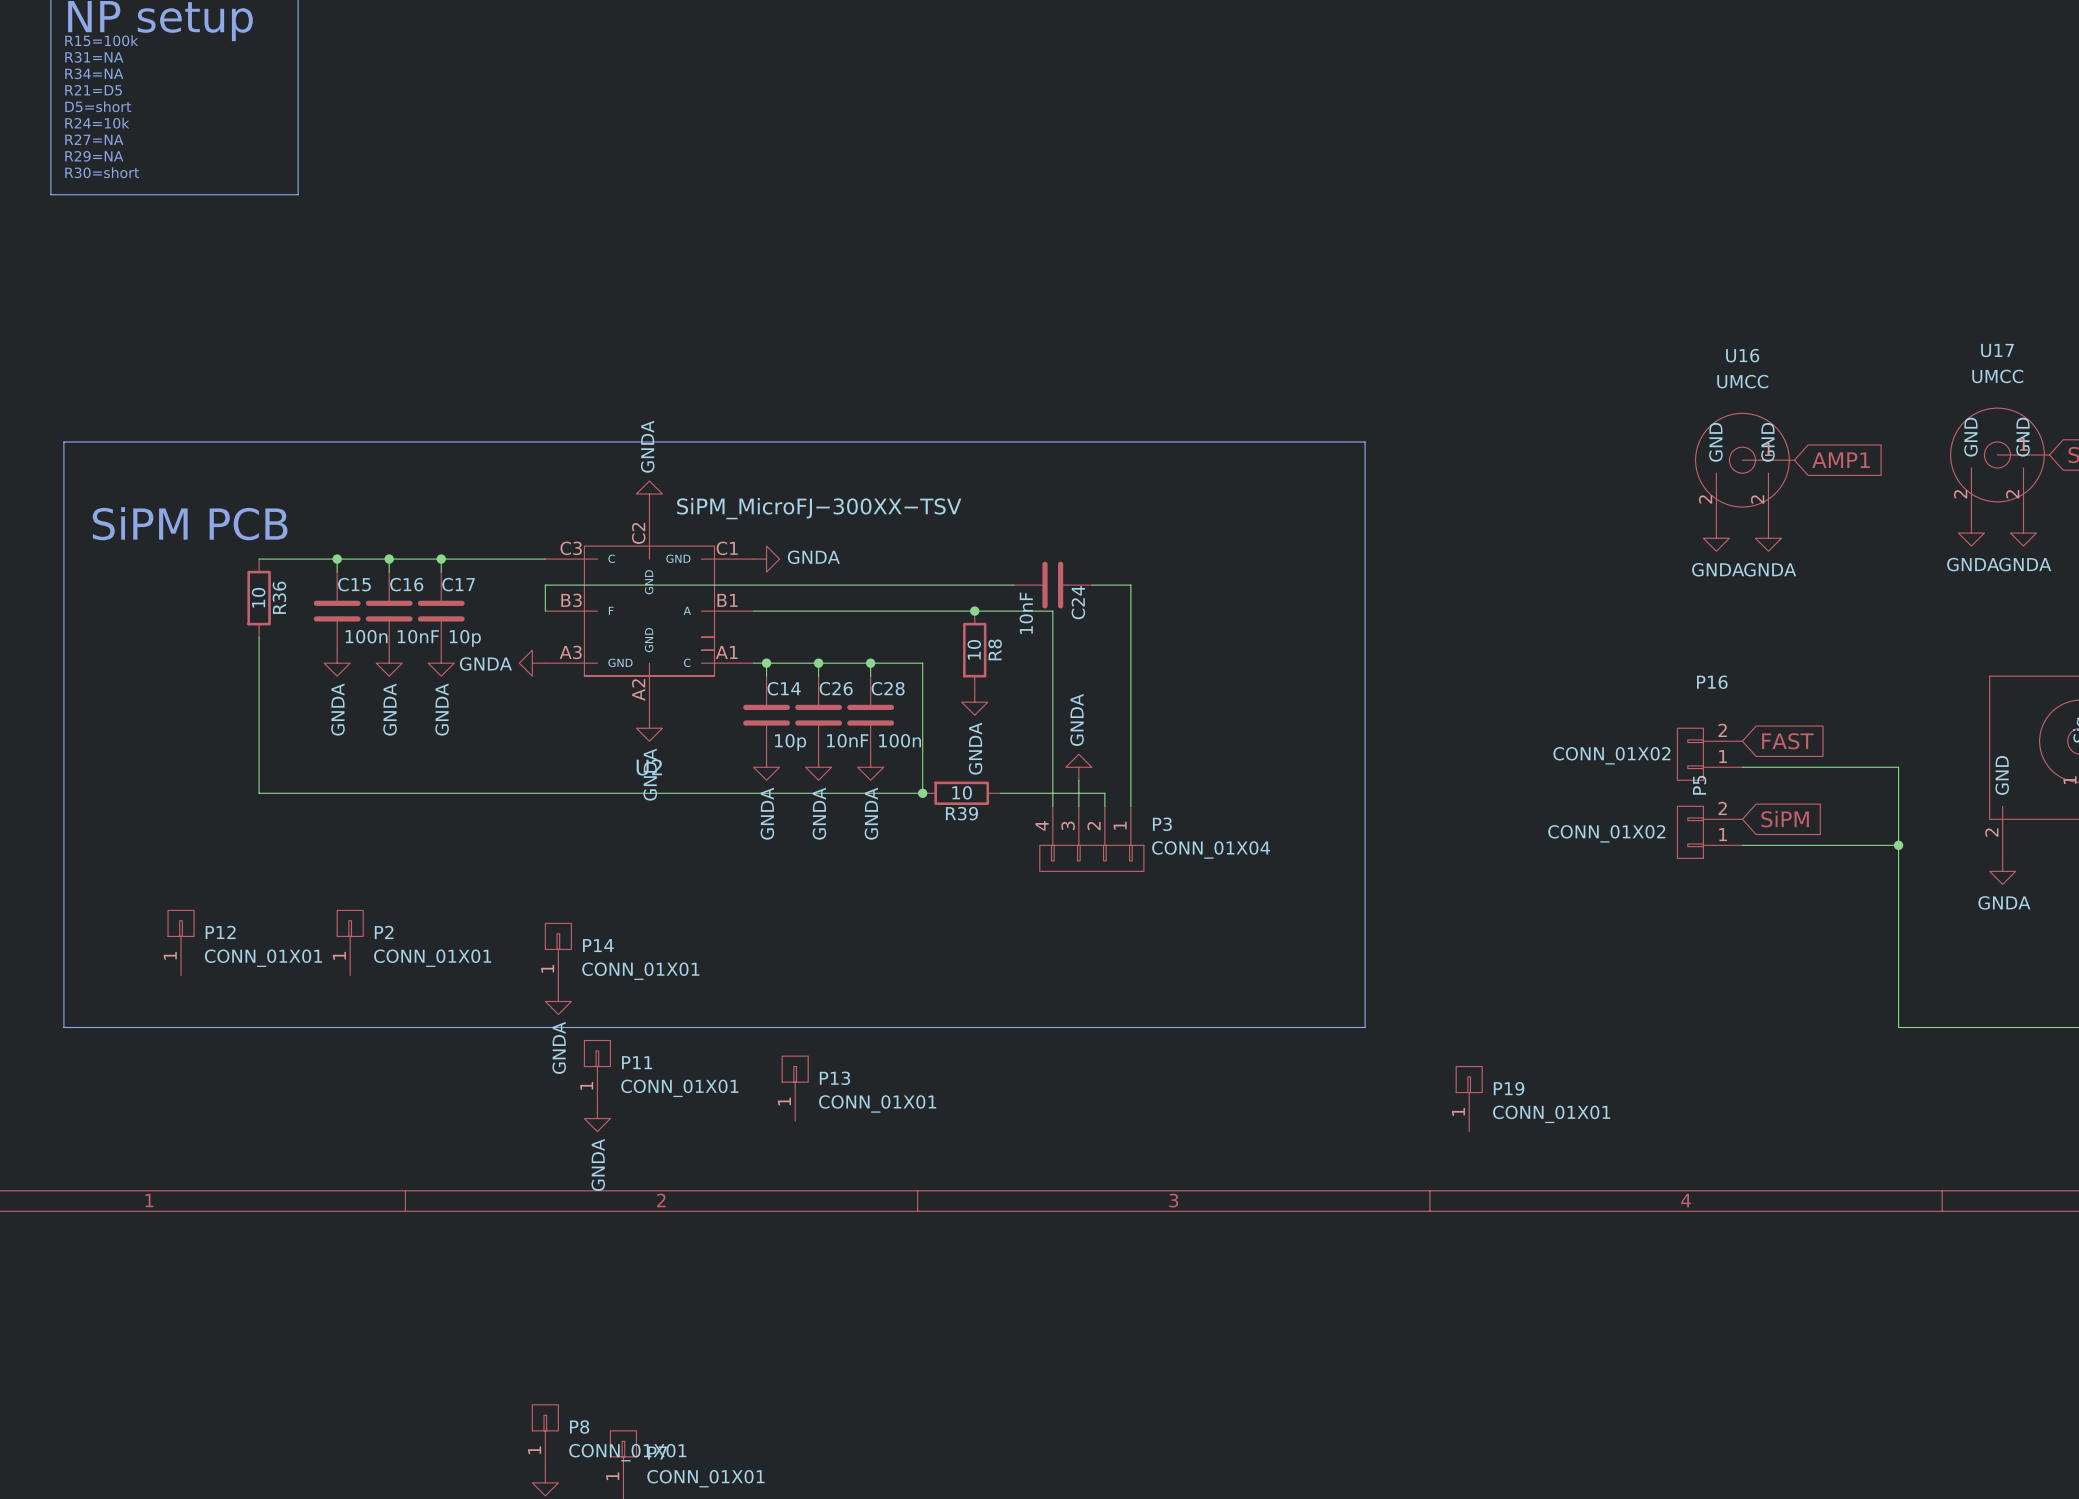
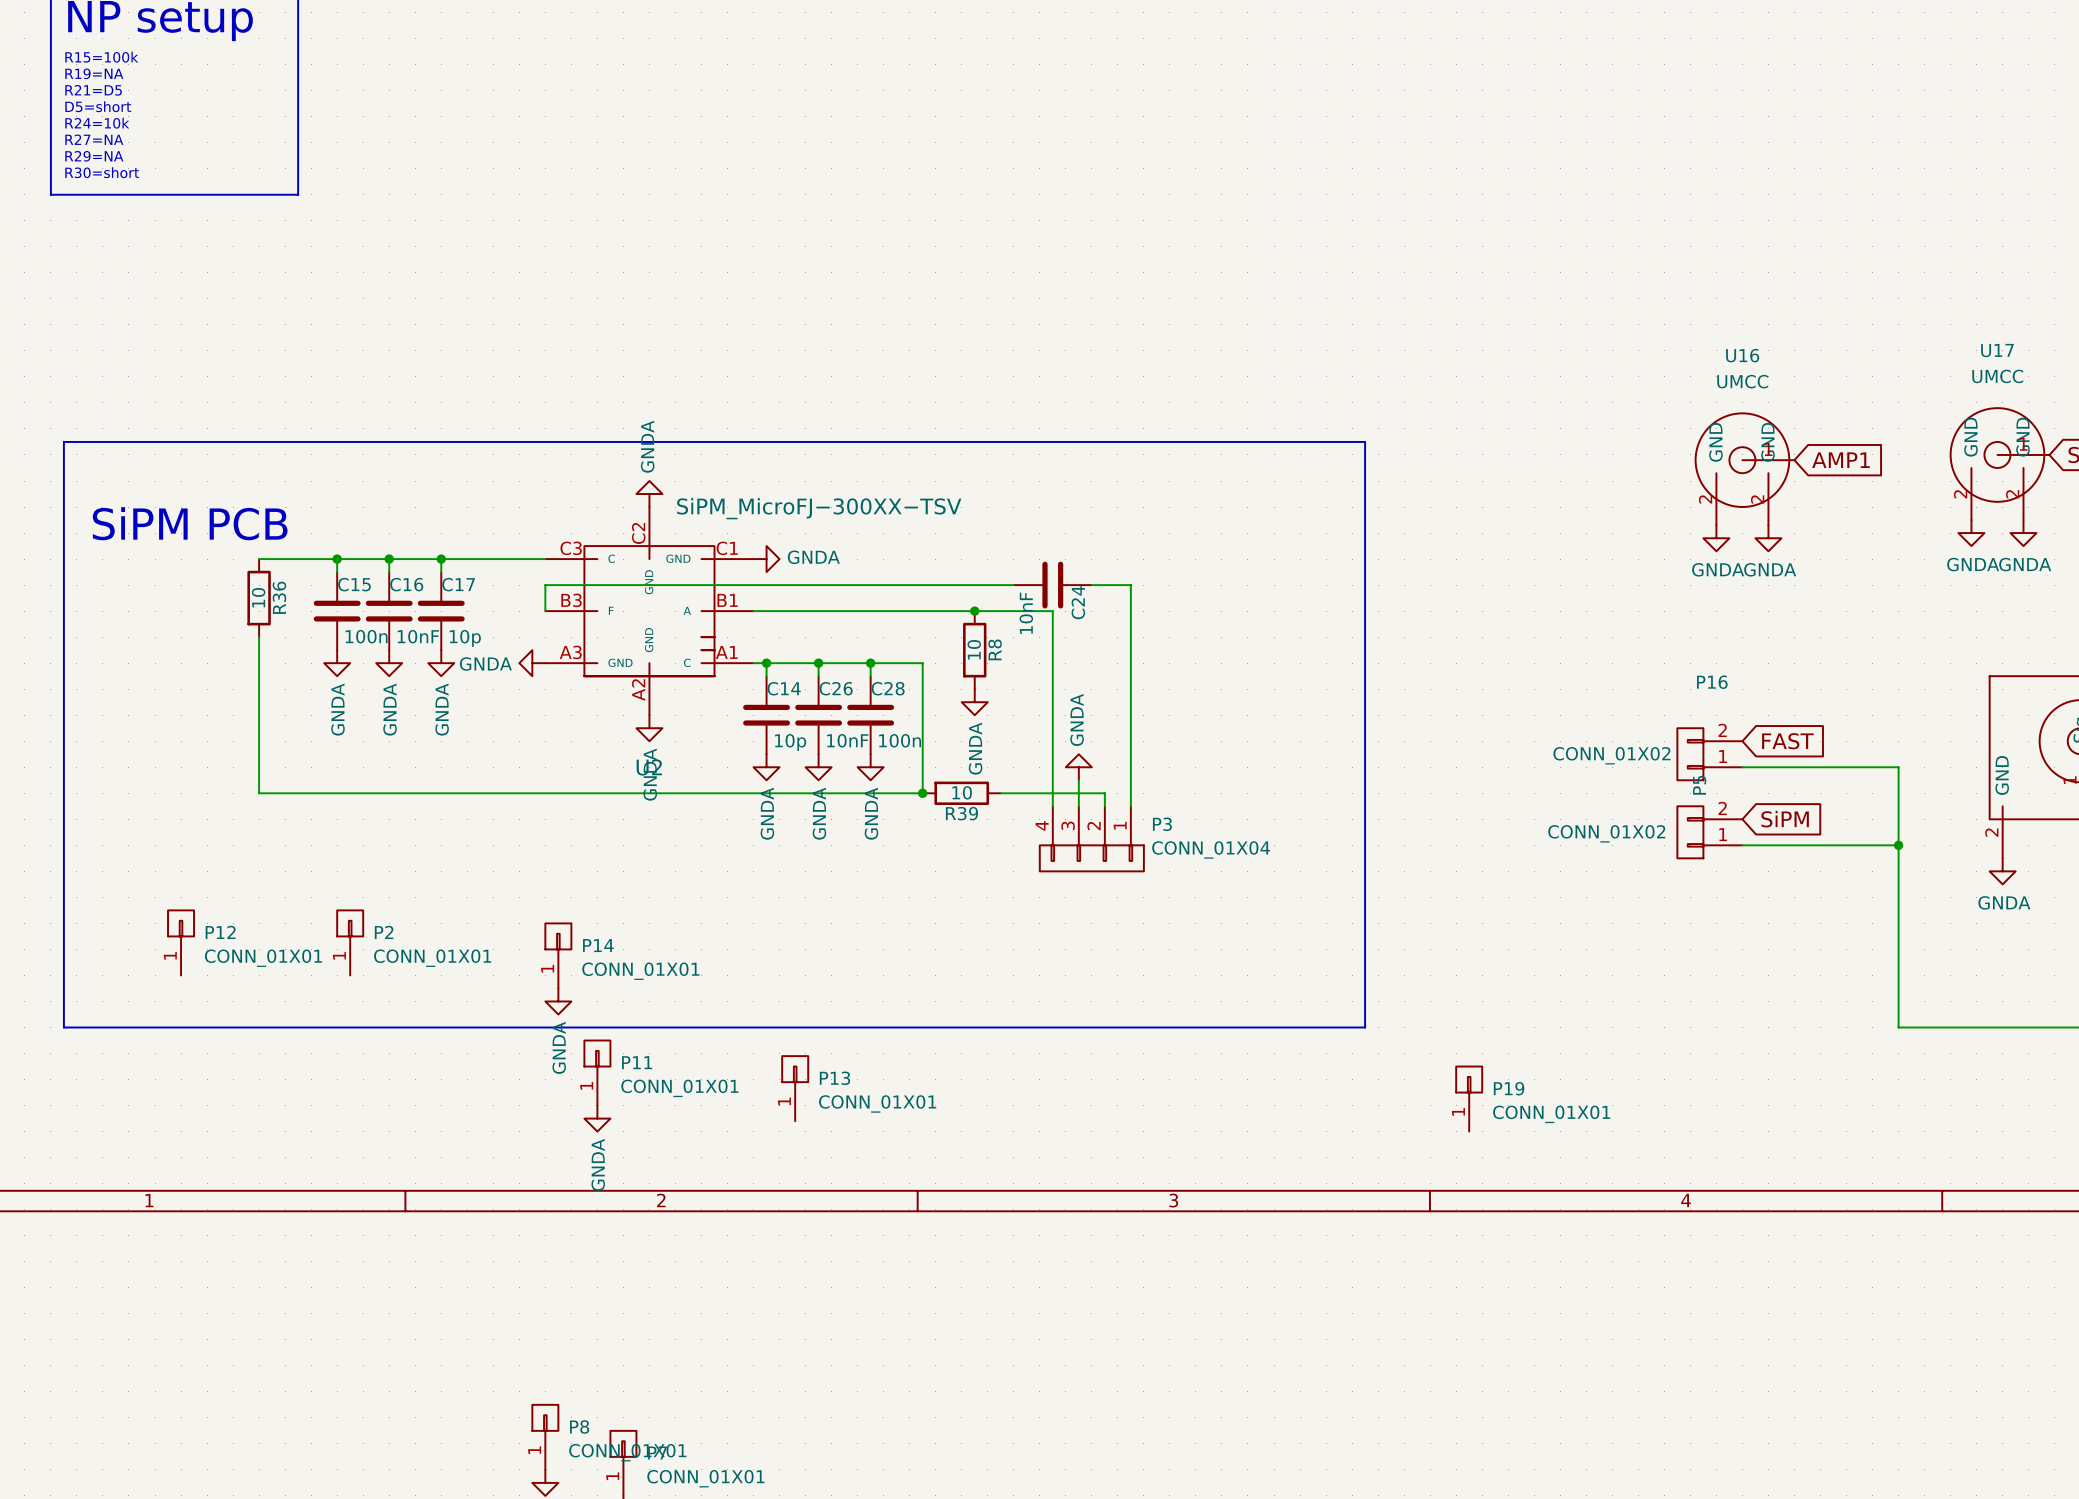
text: R15=100k (101, 40) -> none
text: R31=NA (94, 57) -> R15=100k (101, 57)
text: R34=NA (94, 73) -> R19=NA (94, 73)

